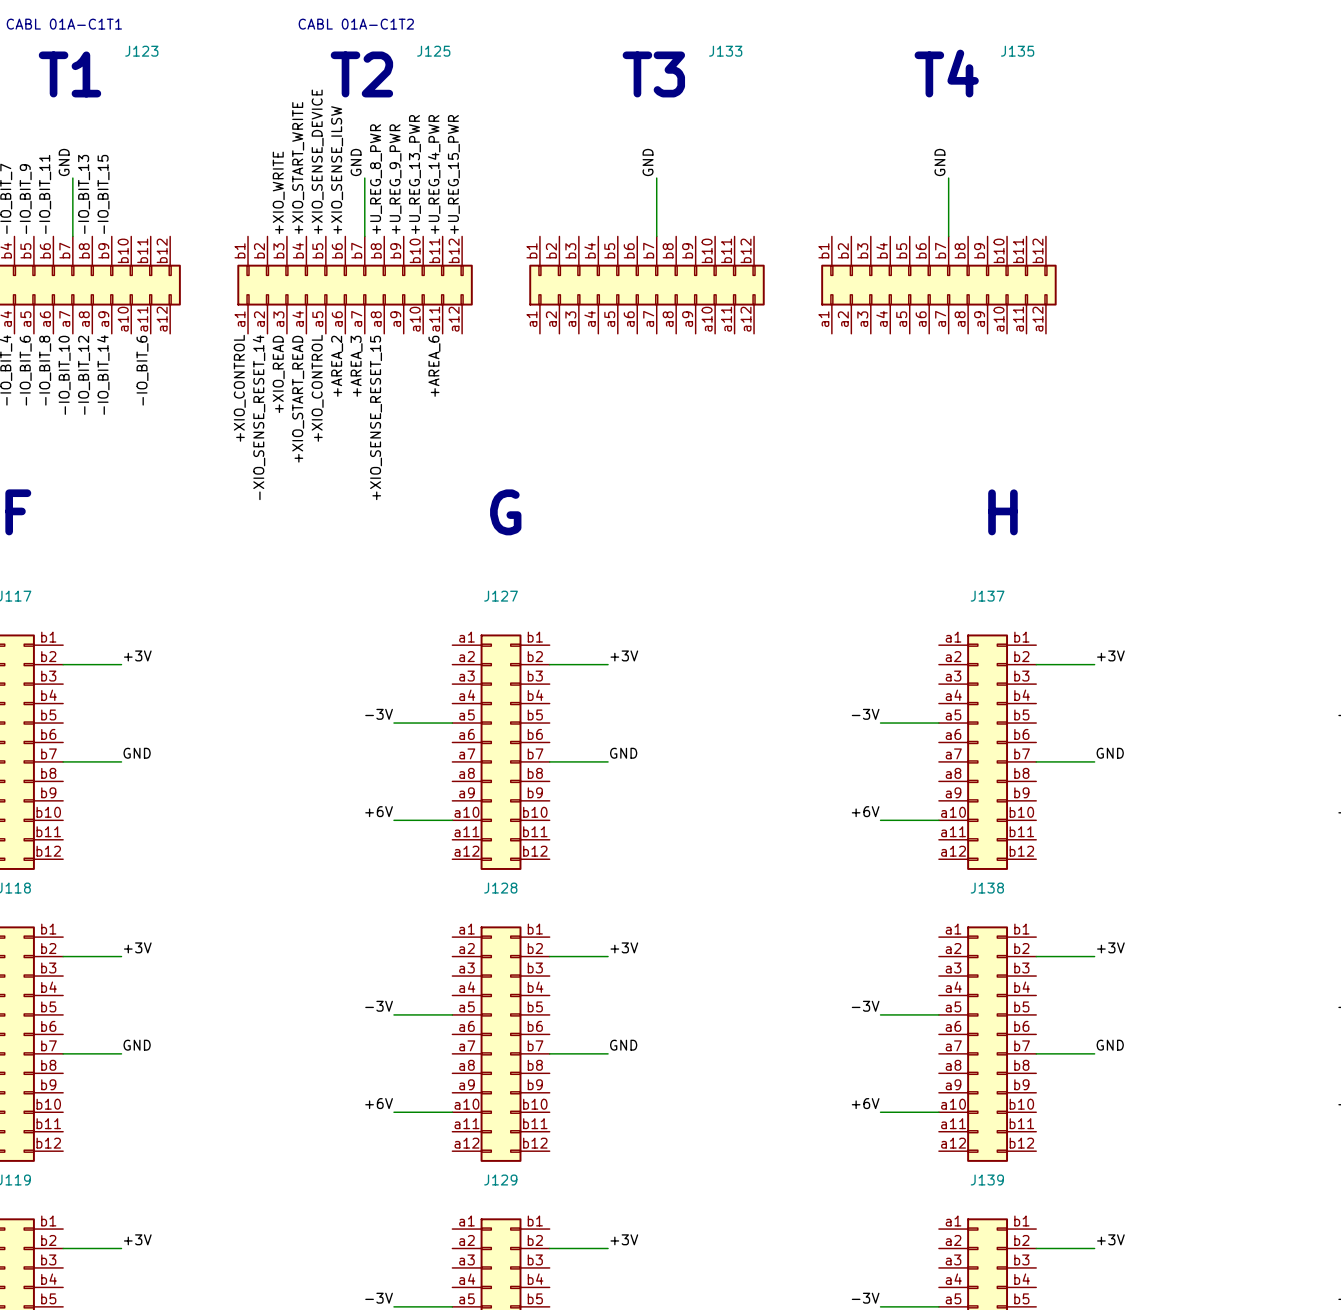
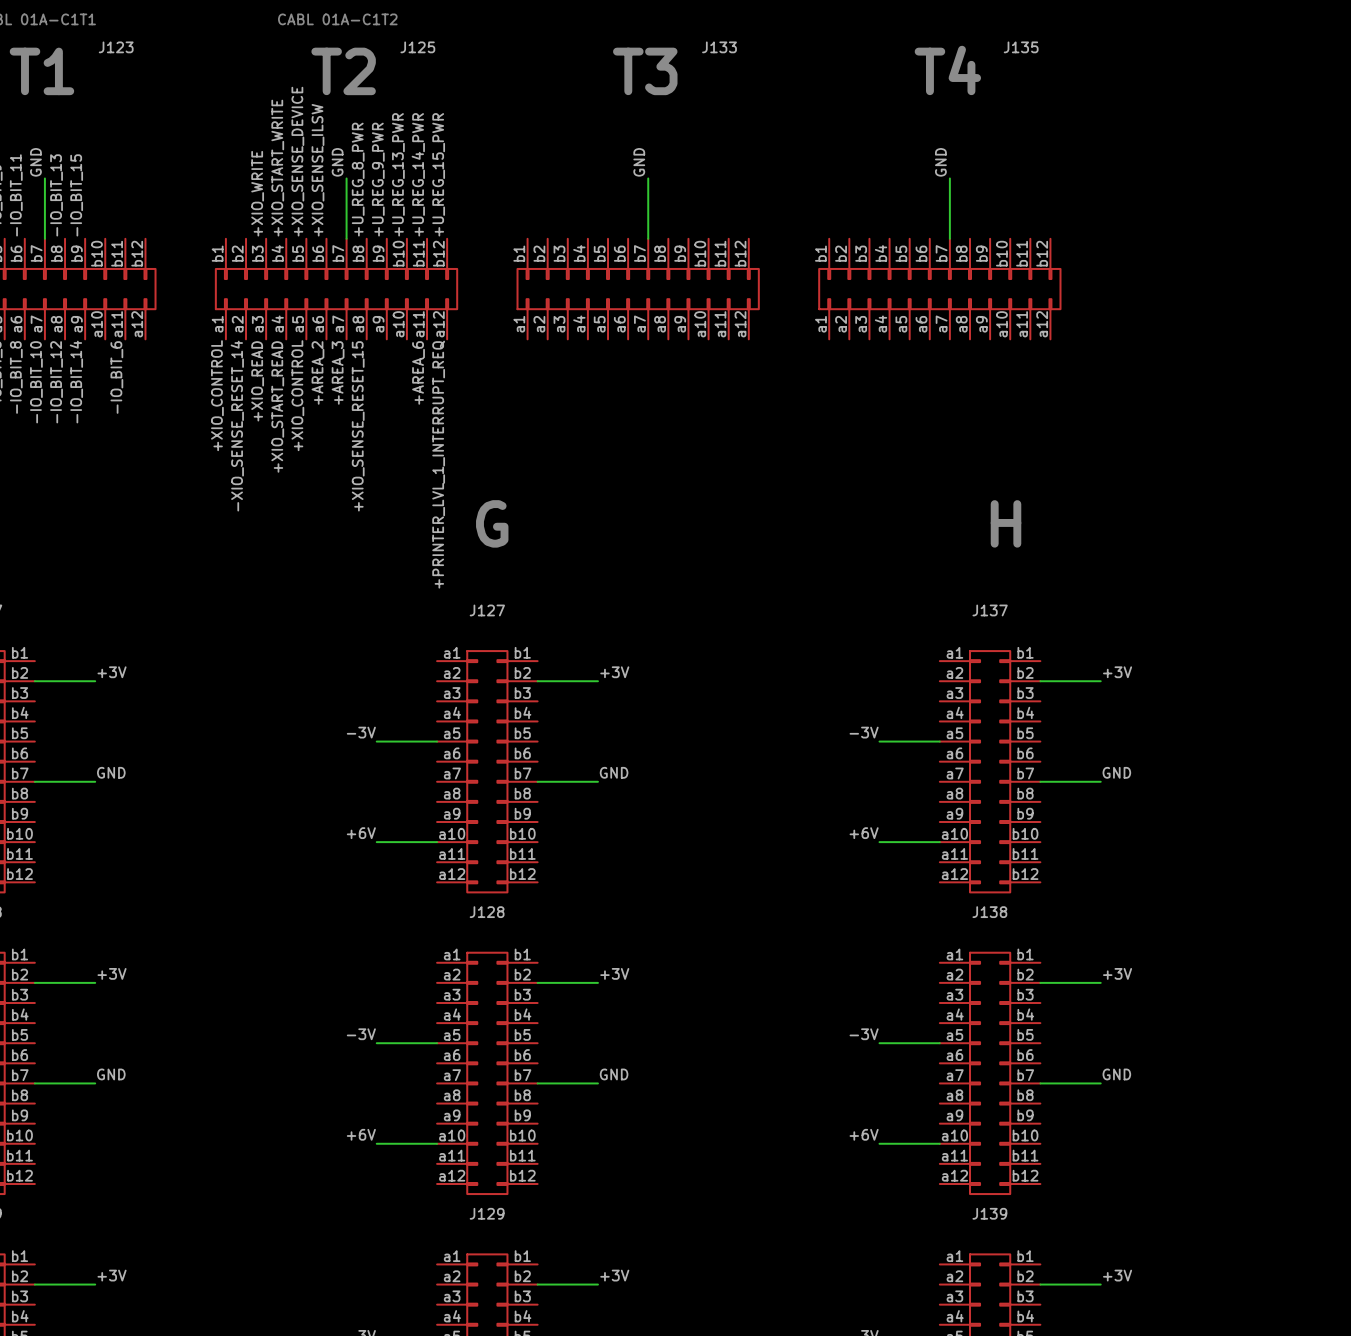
label: none -> +PRINTER_LVL_1_INTERRUPT_REQ (438, 464)

